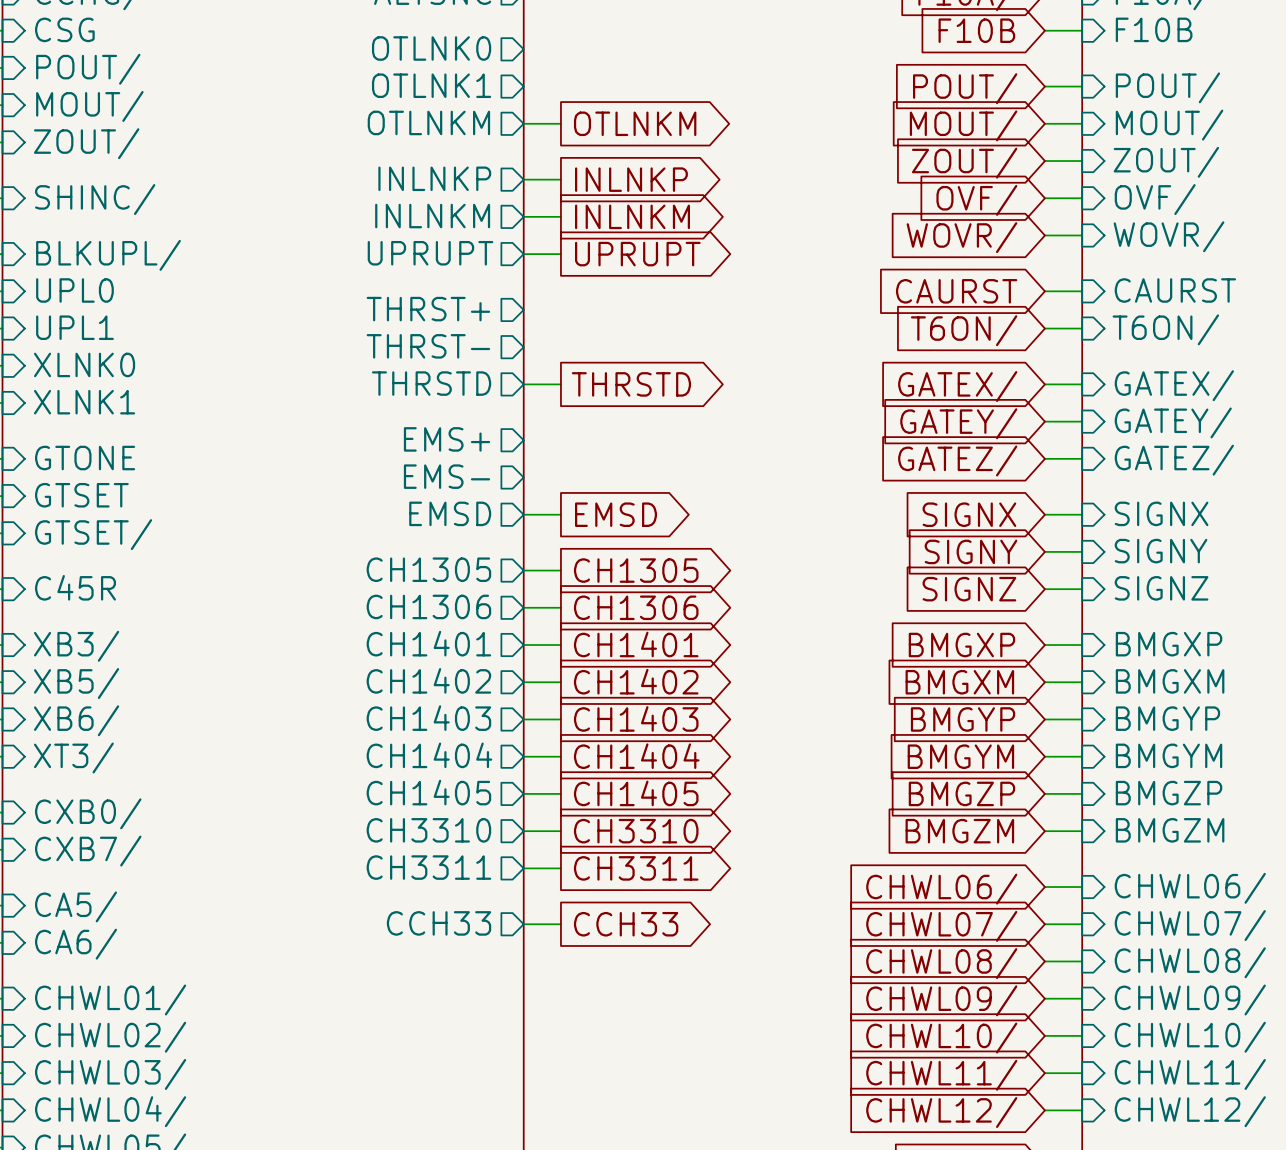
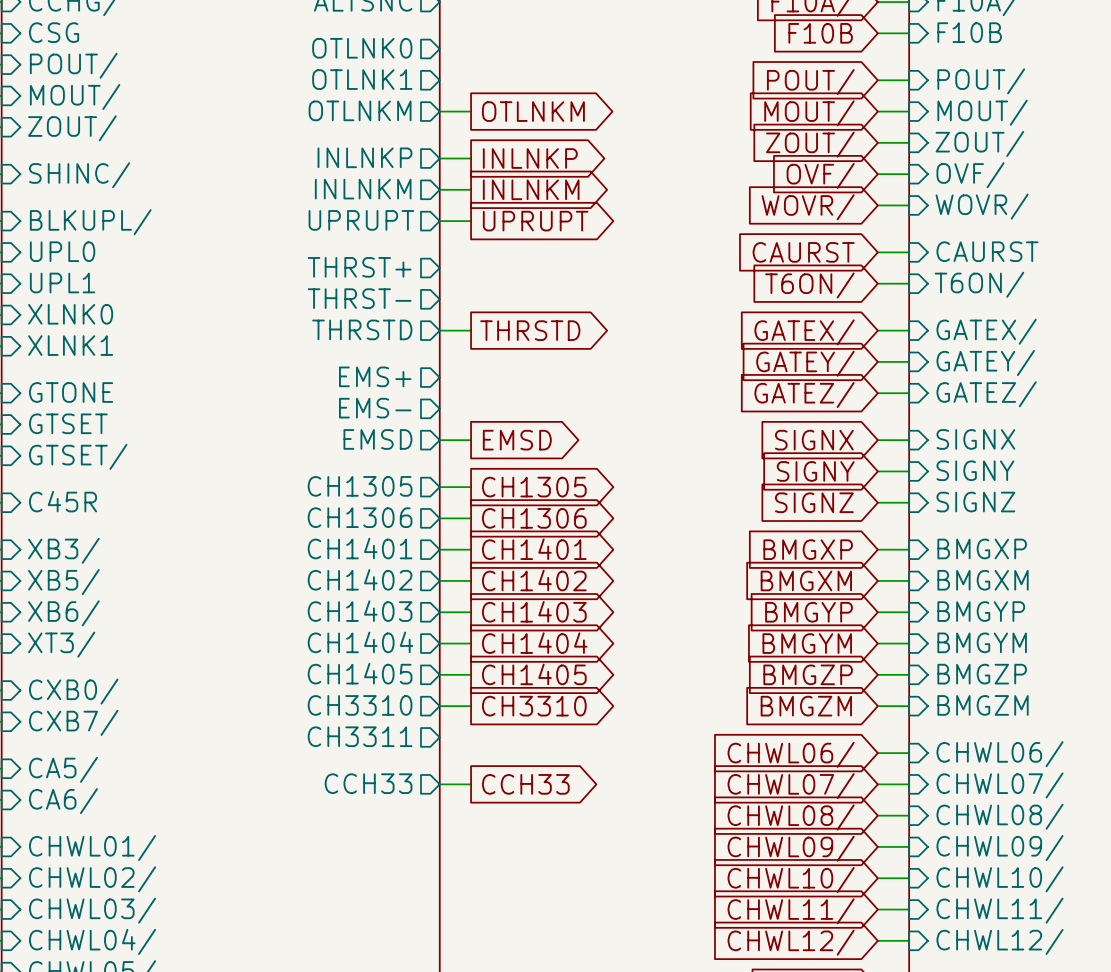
wire: (523, 868) (560, 868) -> none
global label: CH3311 (636, 868) -> none

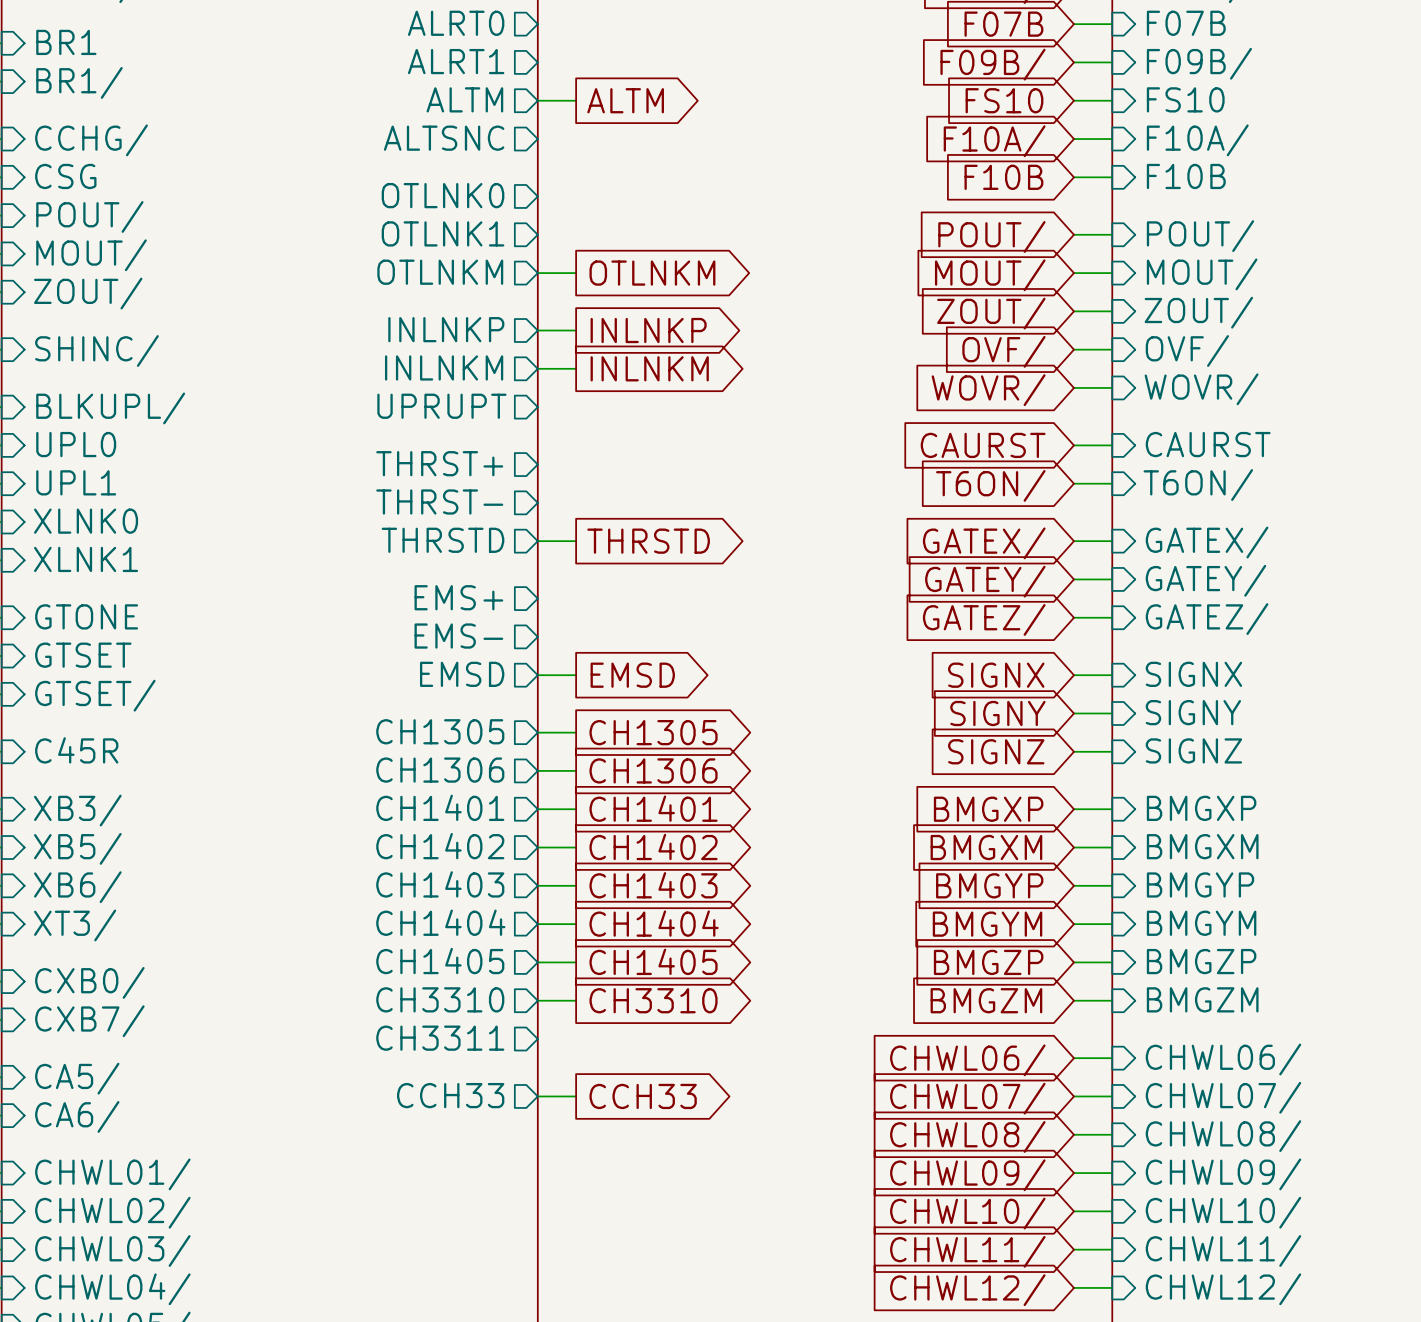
wire: (439, 221) (471, 221) -> none
global label: UPRUPT (535, 221) -> none

